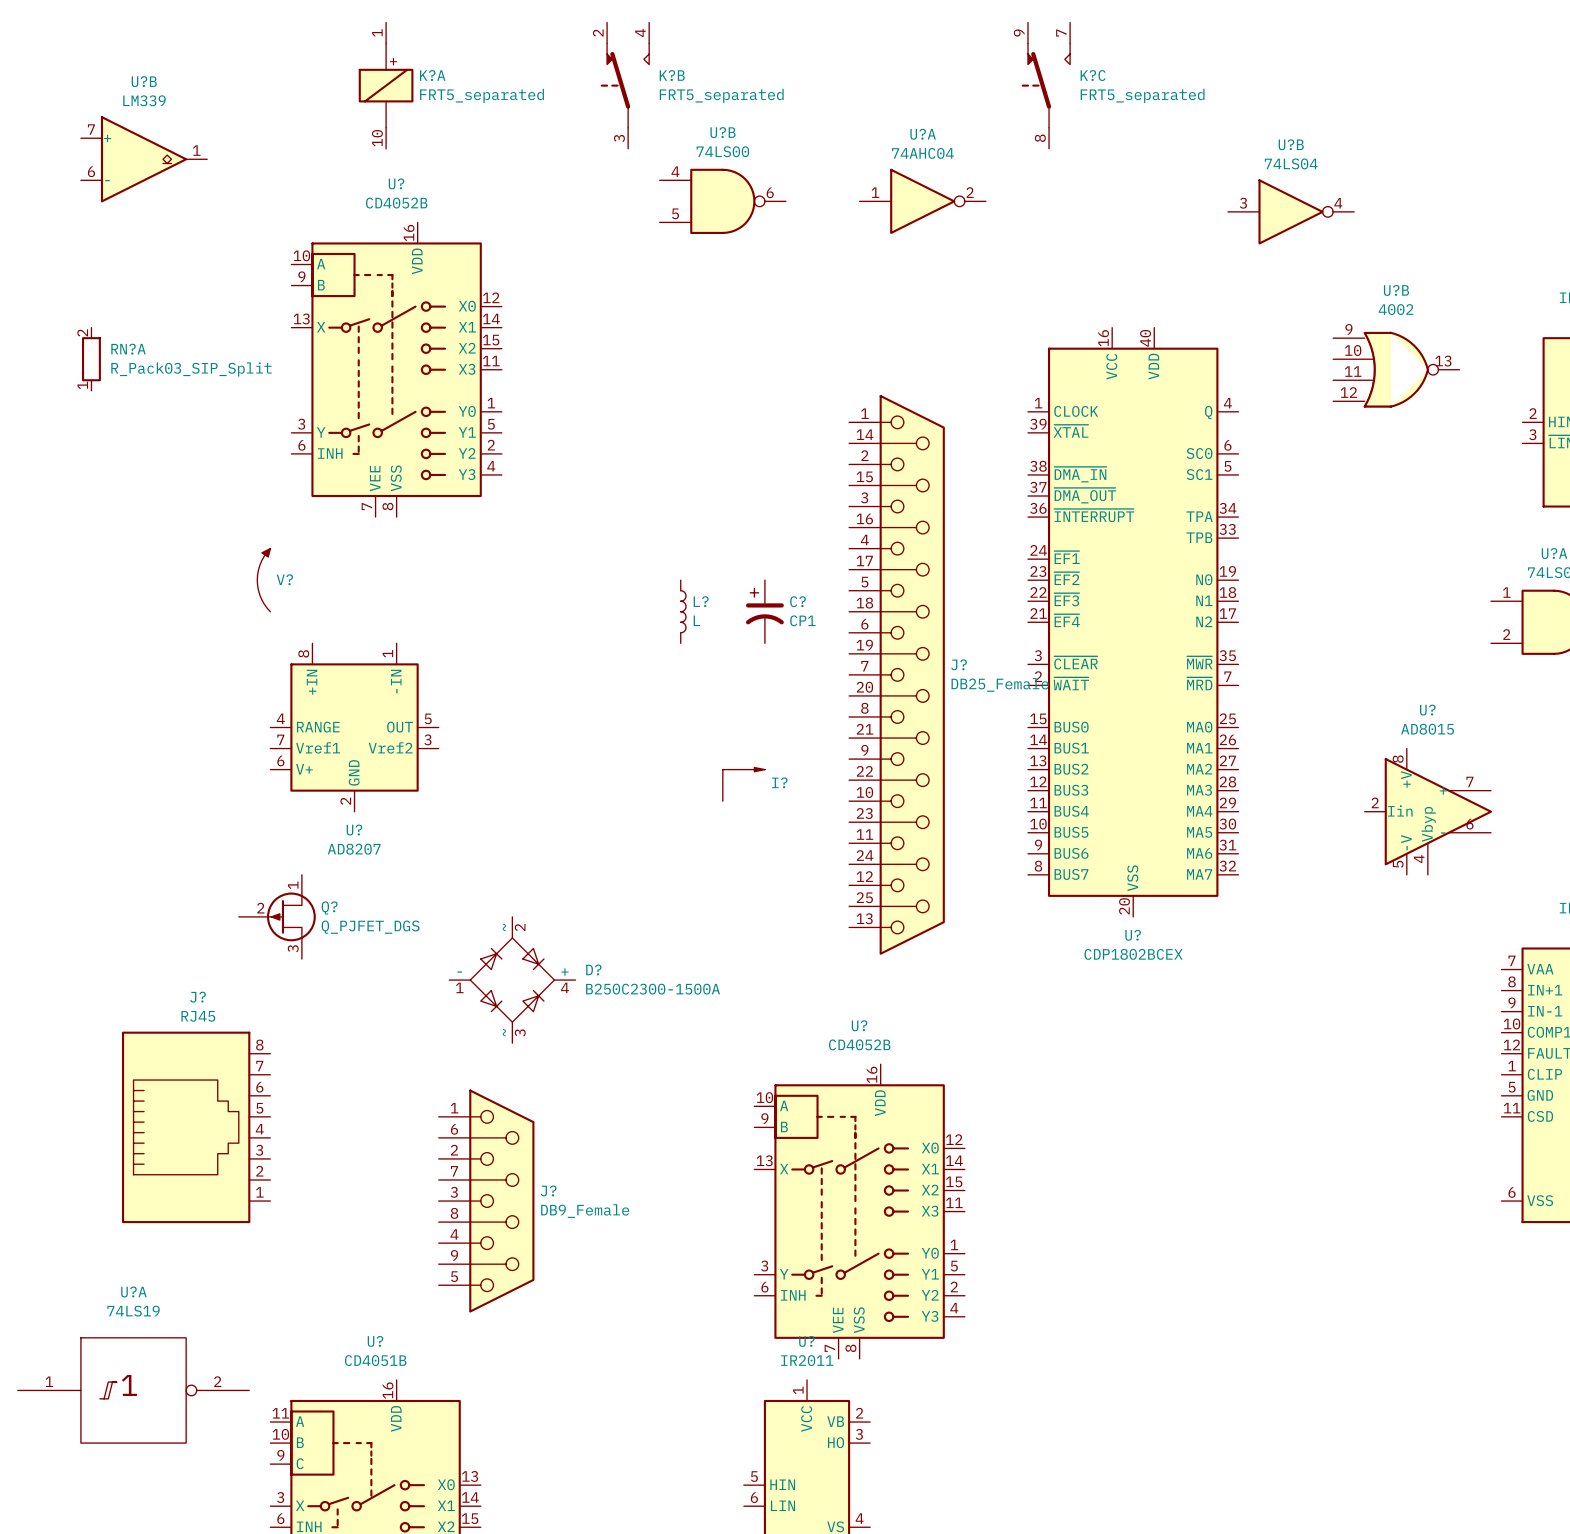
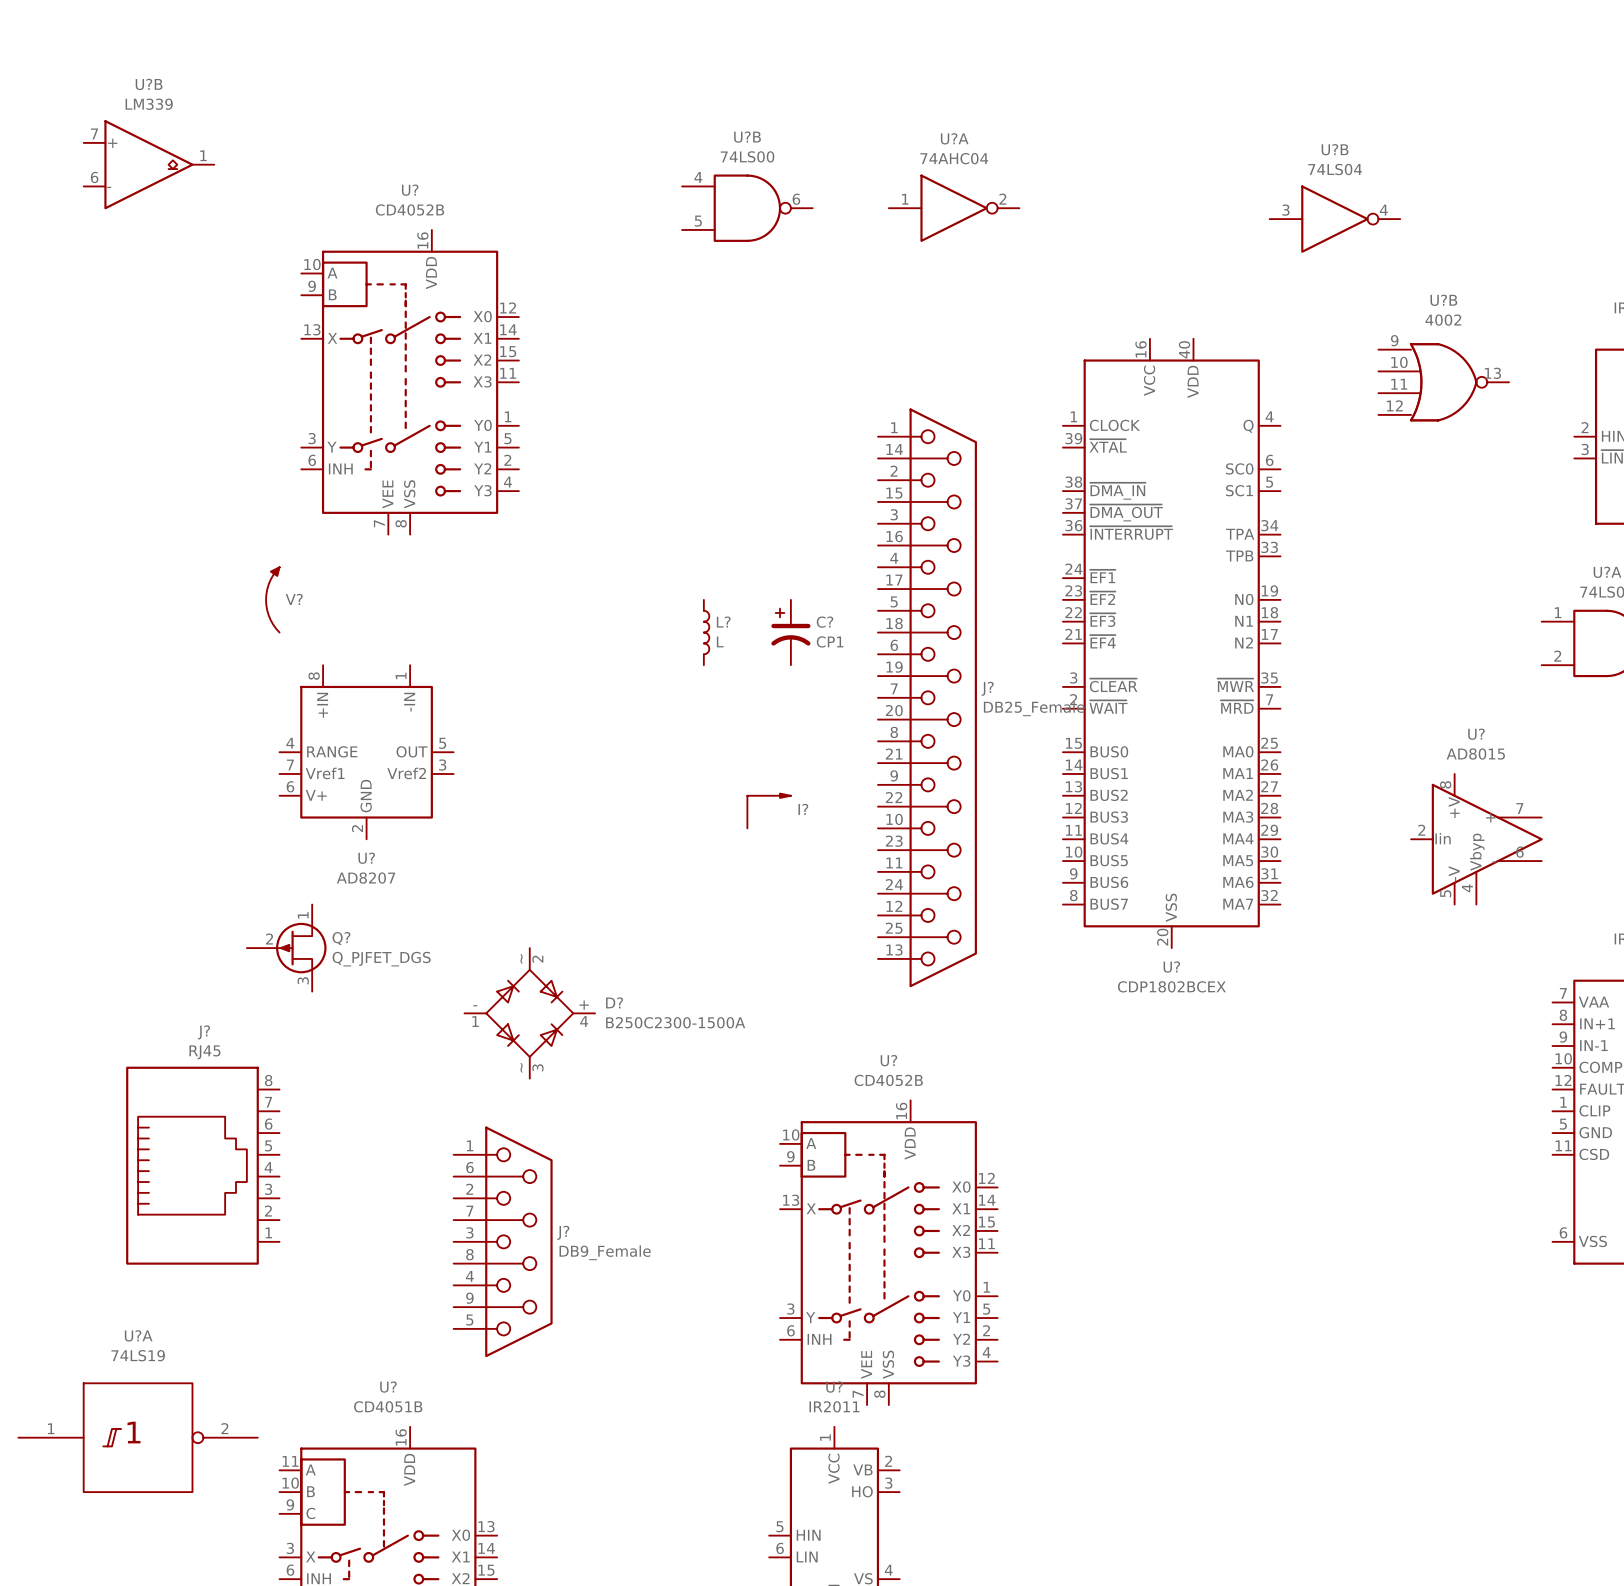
K?A: FRT5_separated (386, 85) -> none
K?B: FRT5_separated (624, 85) -> none
K?C: FRT5_separated (1045, 85) -> none
RN?A: R_Pack03_SIP_Split (91, 359) -> none

